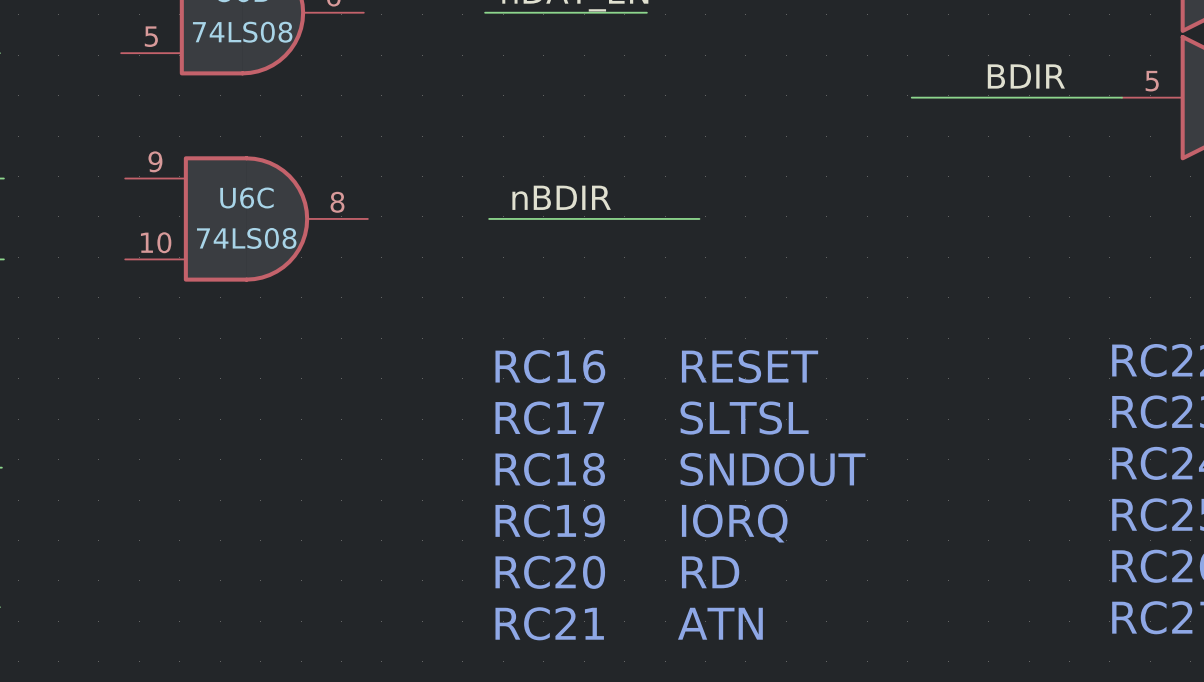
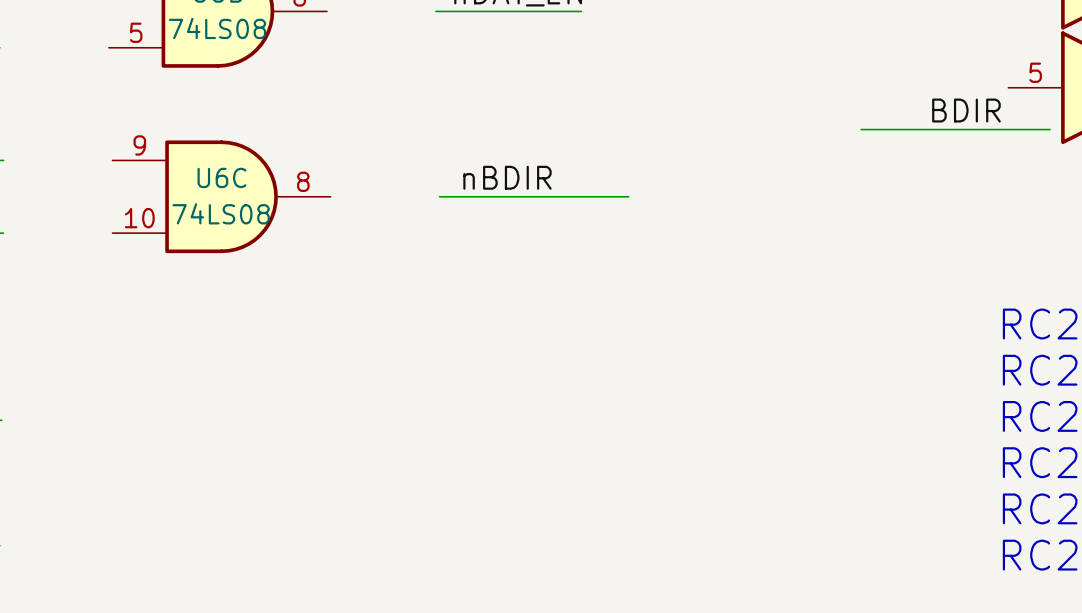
label position: BDIR (1026, 76) -> BDIR (966, 110)
wire: (911, 97) (1122, 97) -> (861, 129) (1050, 129)
text: RC16 RESET (656, 366) -> none
text: RC17 SLTSL (652, 418) -> none
text: RC18 SNDOUT (680, 469) -> none
text: RC19 IORQ (641, 523) -> none
text: RC20 RD (617, 572) -> none
text: RC21 ATN (629, 623) -> none

